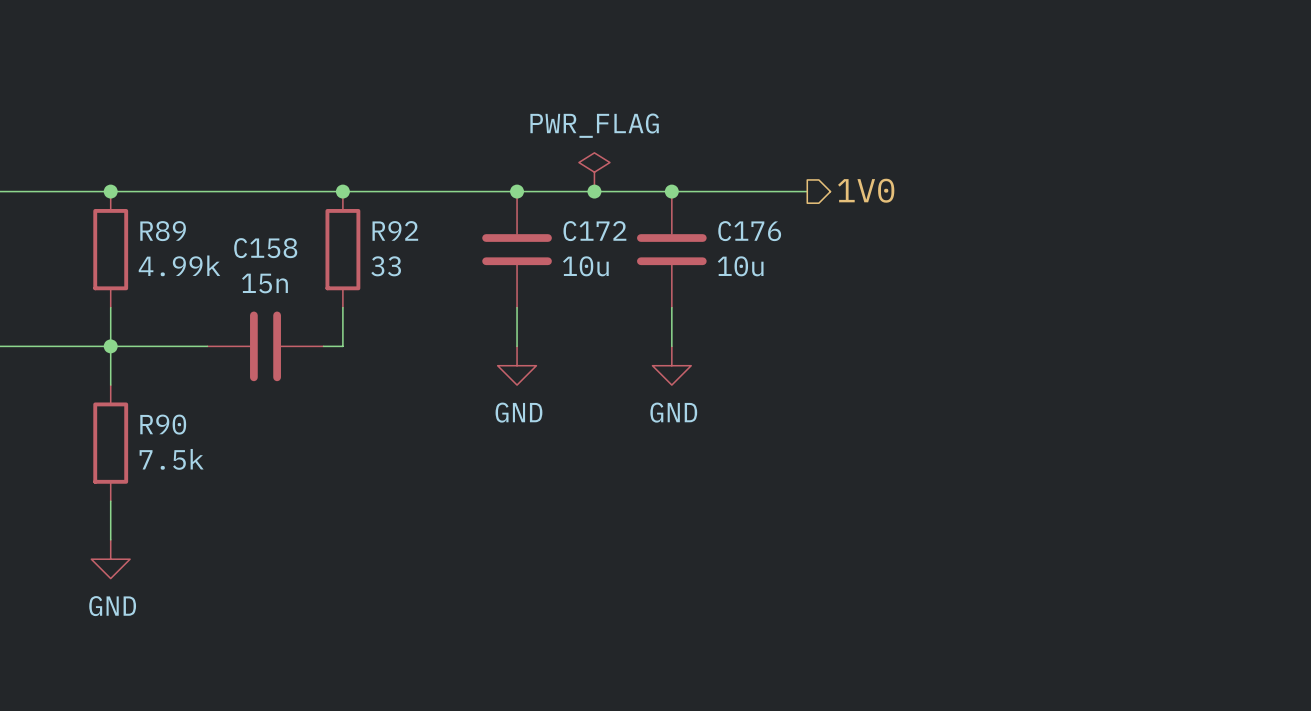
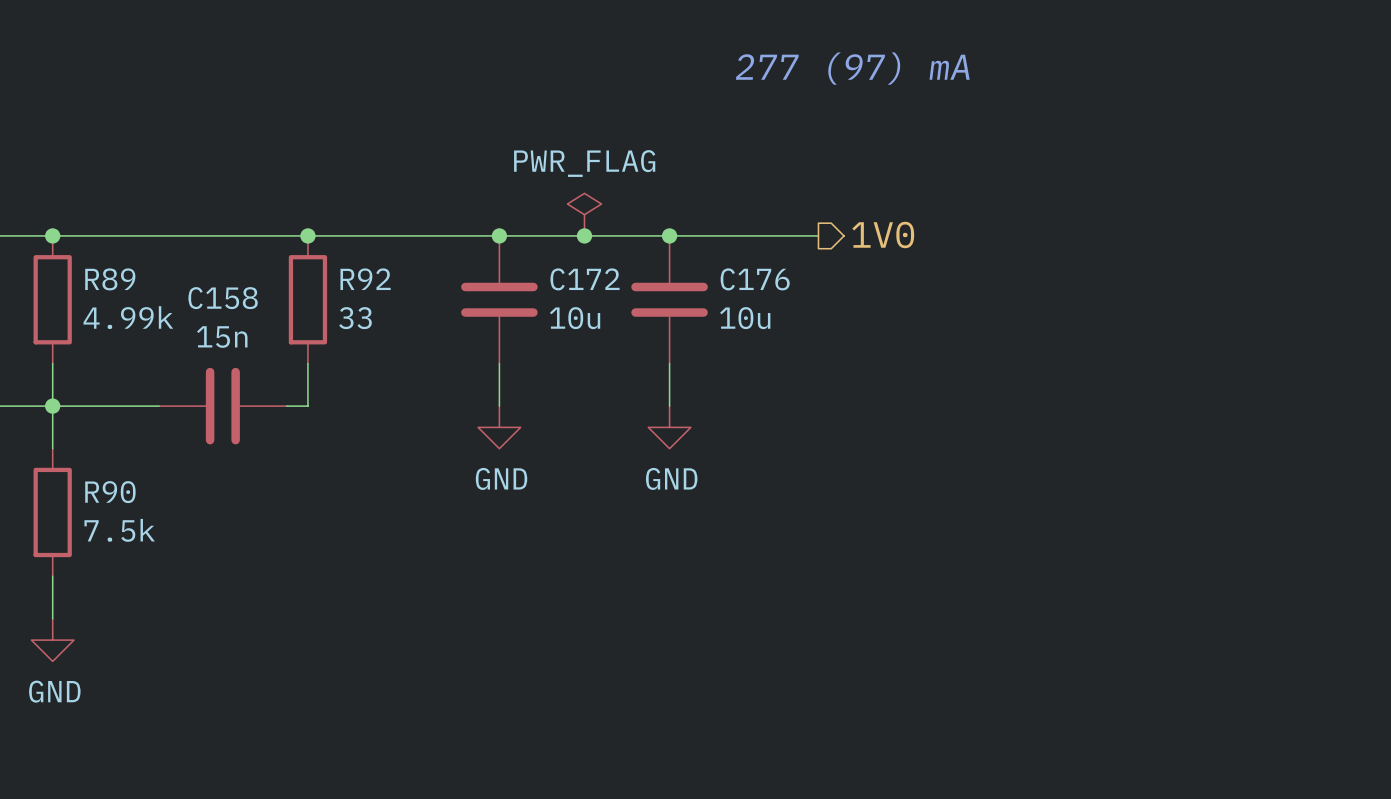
text: none -> 277 (97) mA (852, 68)

